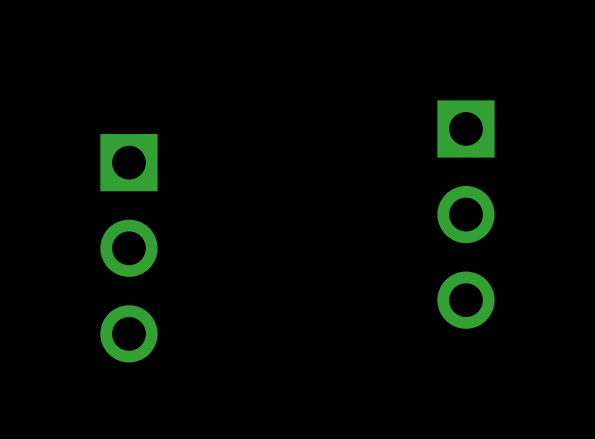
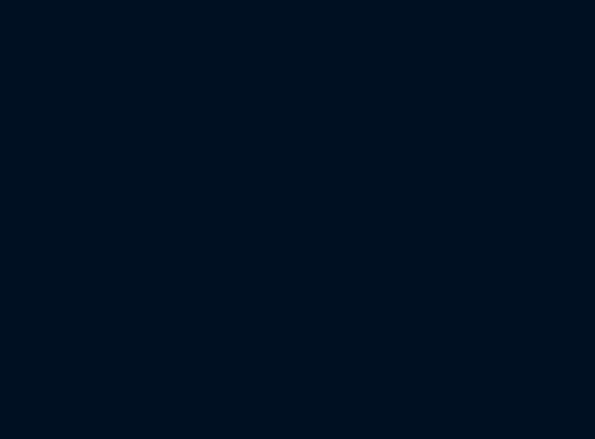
part: (465, 214) -> none
part: (128, 248) -> none

